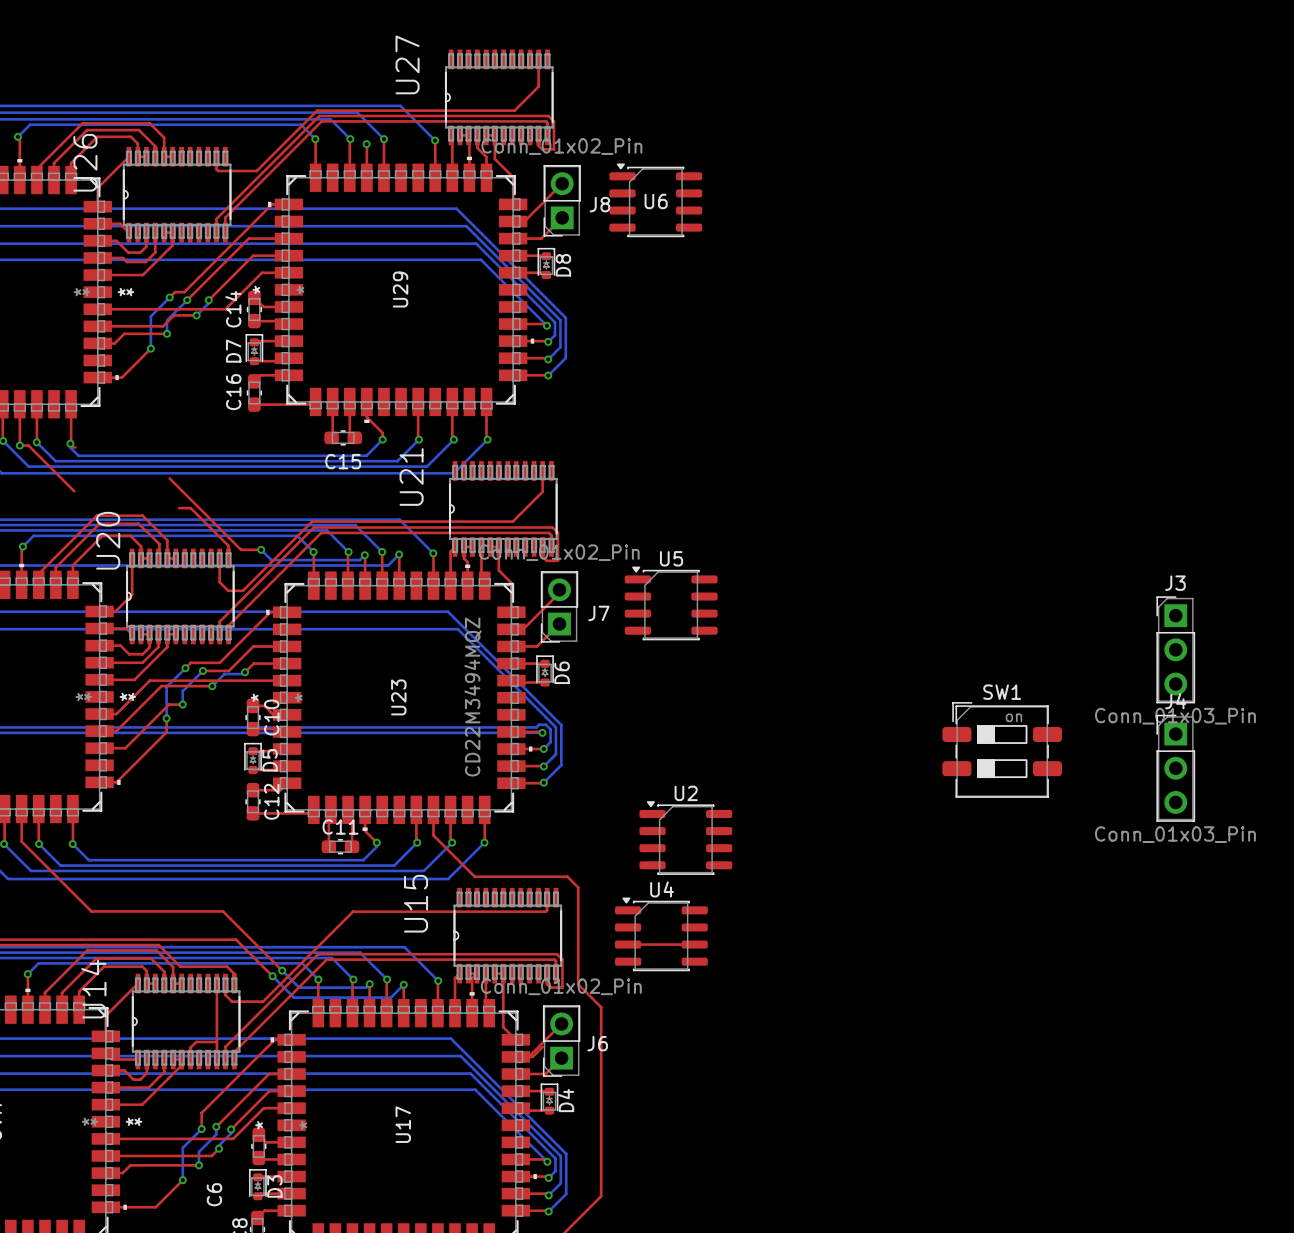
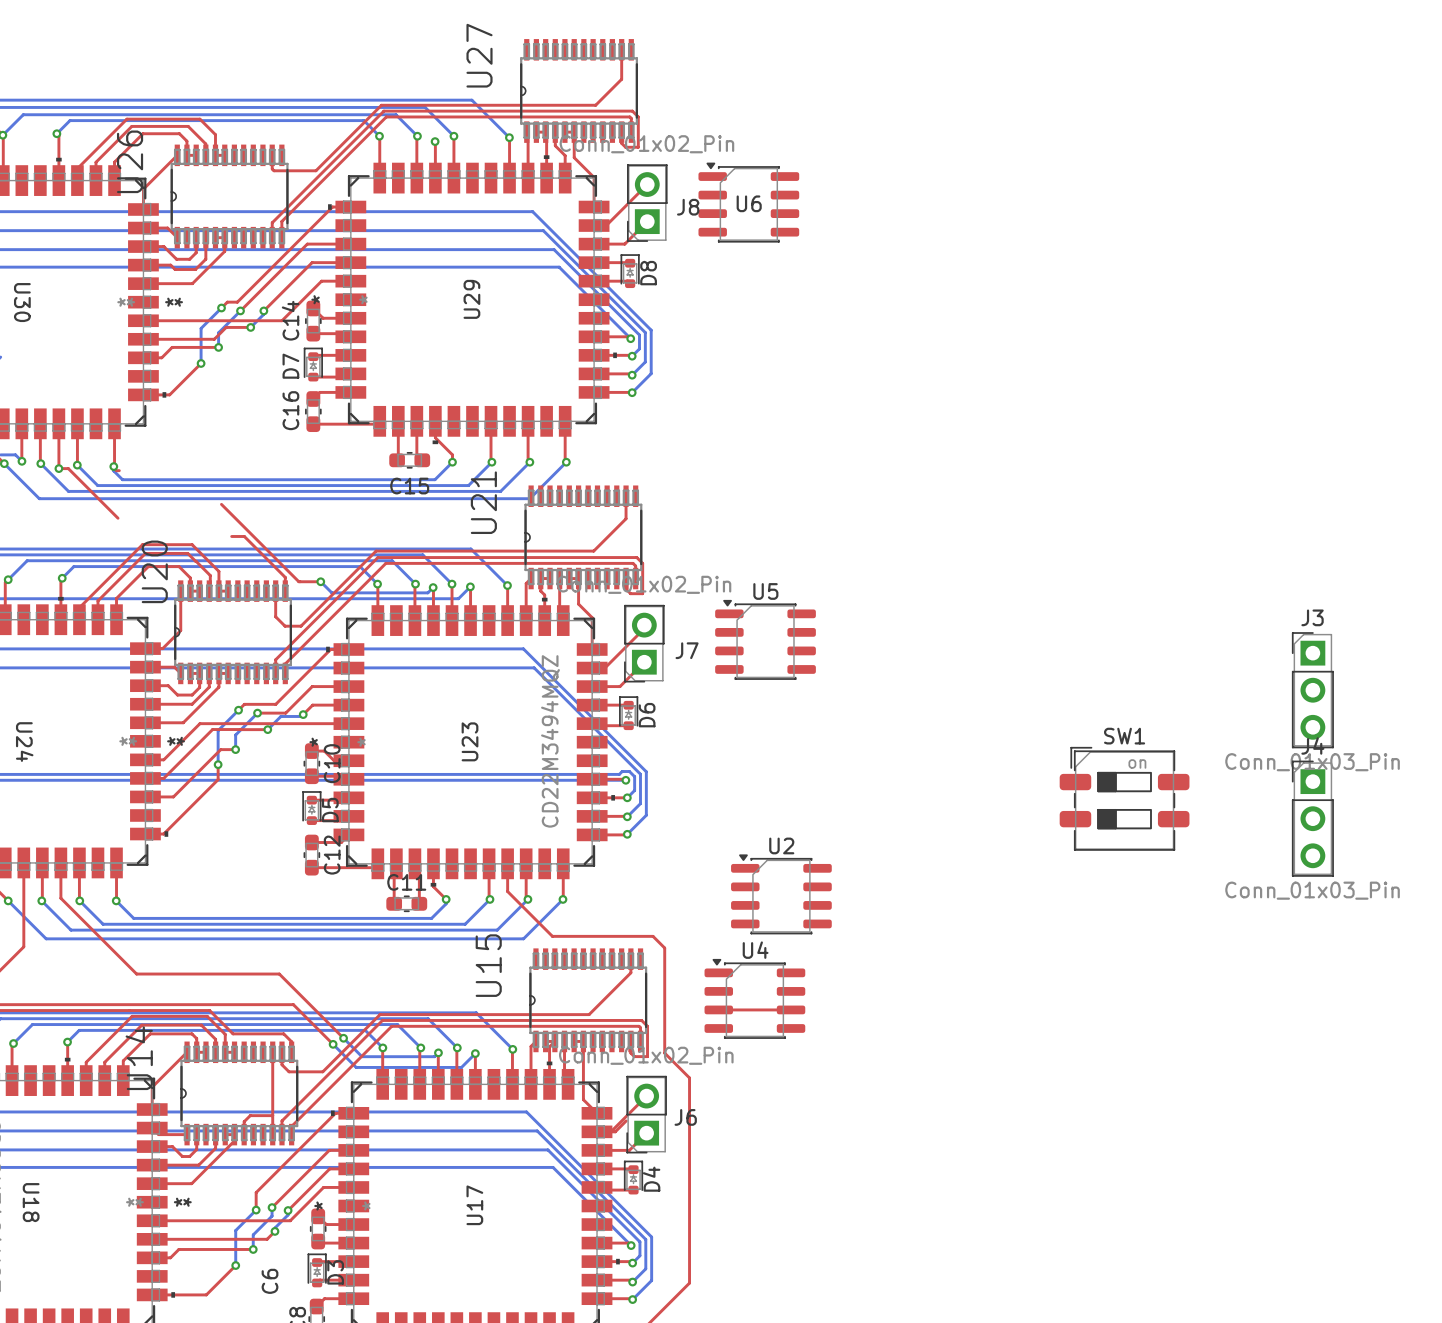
top track: (545, 911) (353, 911) (315, 948) -> (629, 974) (589, 1014) (380, 1014)

